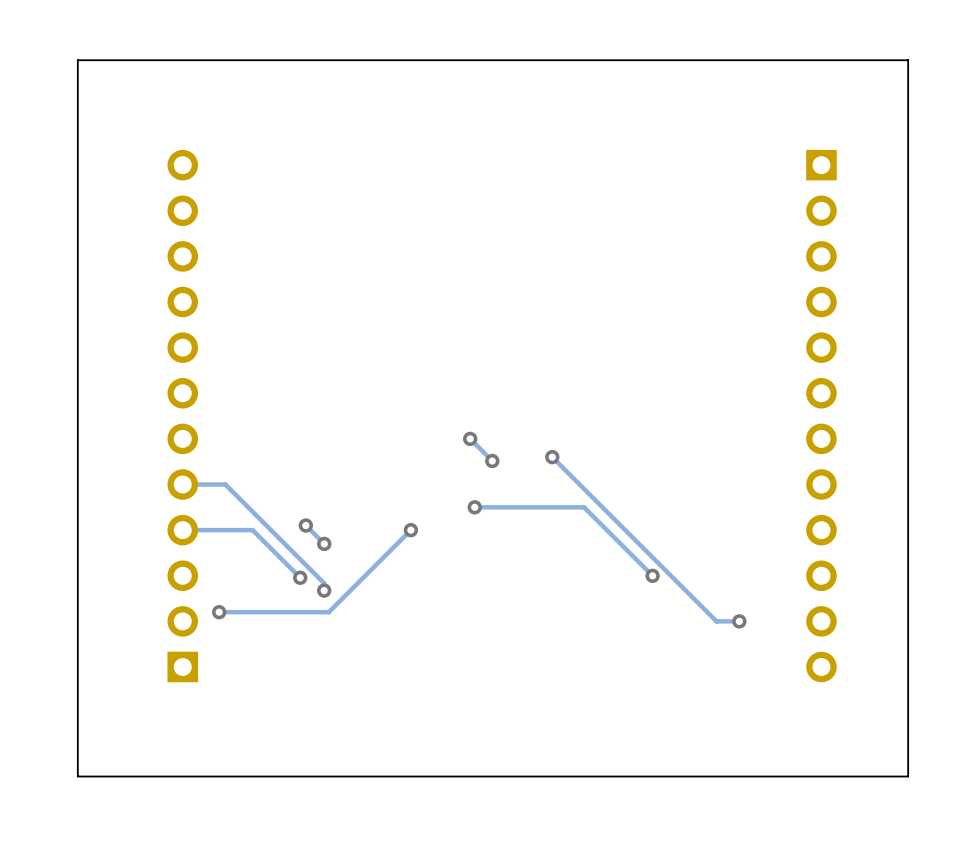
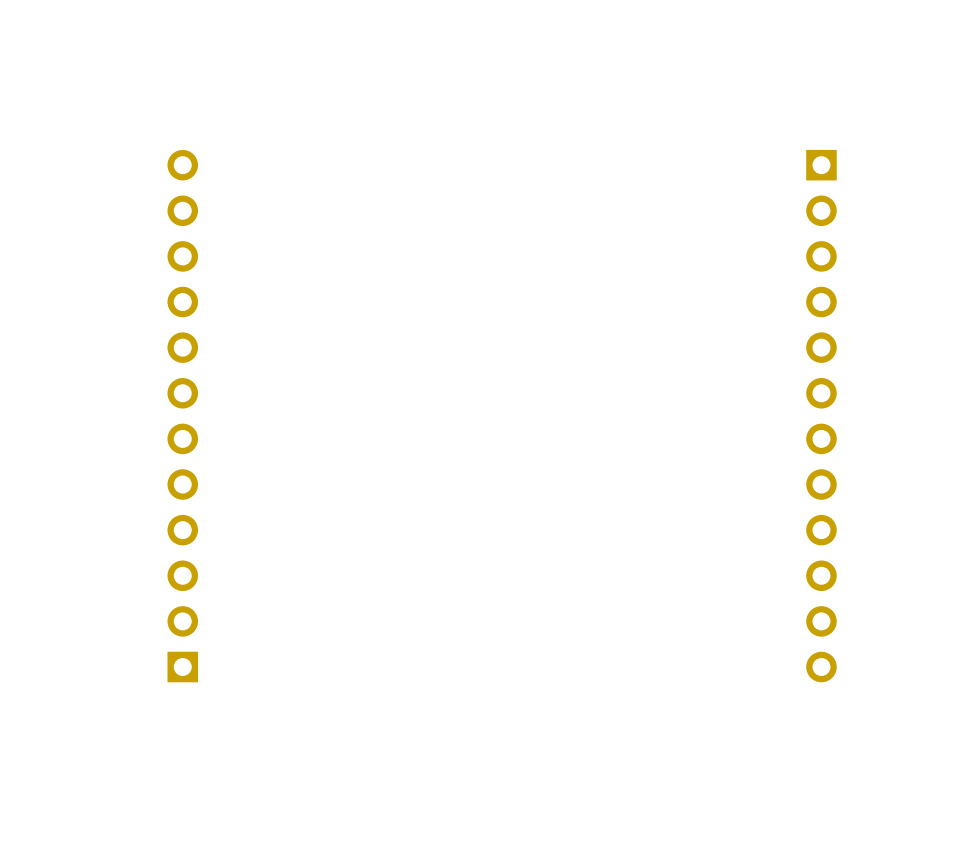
board edge: (908, 60) (77, 60) (77, 776) (908, 776) (908, 60) -> none
track: (470, 438) (492, 461) -> none
via: (470, 438) -> none
track: (552, 457) (716, 621) (739, 621) -> none
via: (552, 457) -> none
via: (492, 461) -> none
track: (182, 484) (225, 484) (324, 583) (324, 590) -> none
track: (474, 507) (584, 507) (652, 575) -> none
via: (474, 507) -> none
track: (305, 525) (324, 543) -> none
via: (305, 525) -> none
track: (182, 530) (252, 530) (300, 577) -> none
track: (410, 530) (328, 612) (219, 612) -> none
via: (410, 530) -> none
via: (324, 543) -> none
via: (652, 575) -> none
via: (300, 577) -> none
via: (324, 590) -> none
via: (219, 612) -> none
via: (739, 621) -> none

